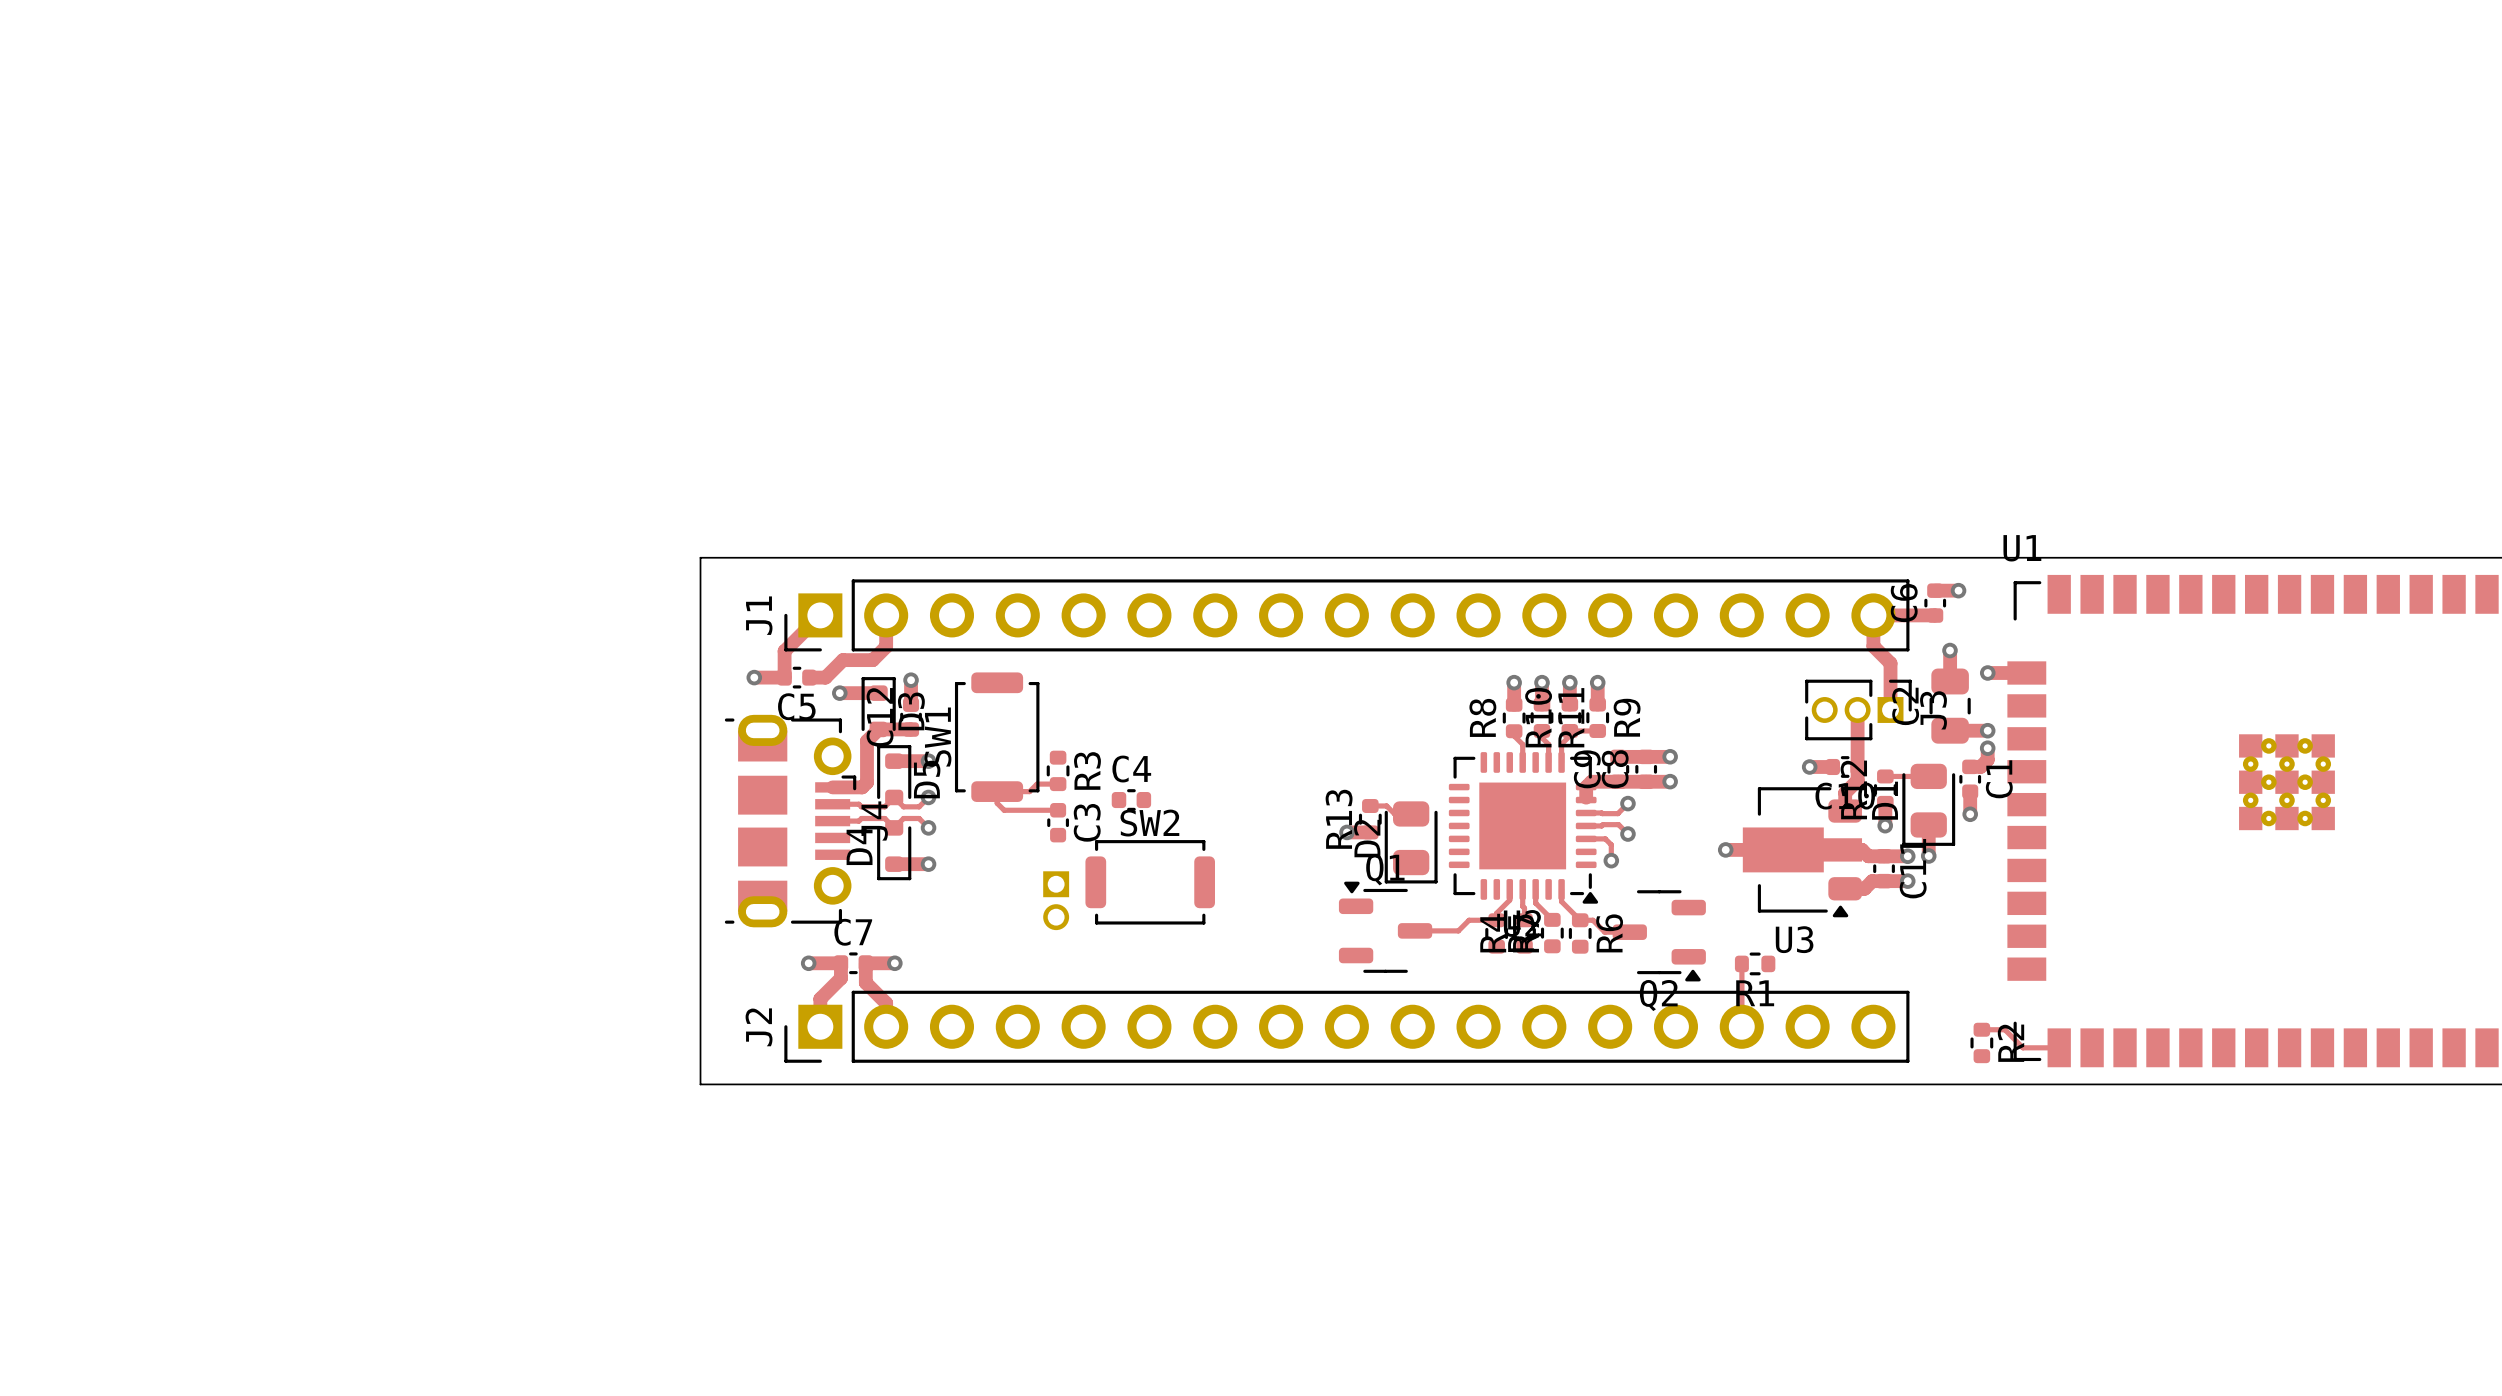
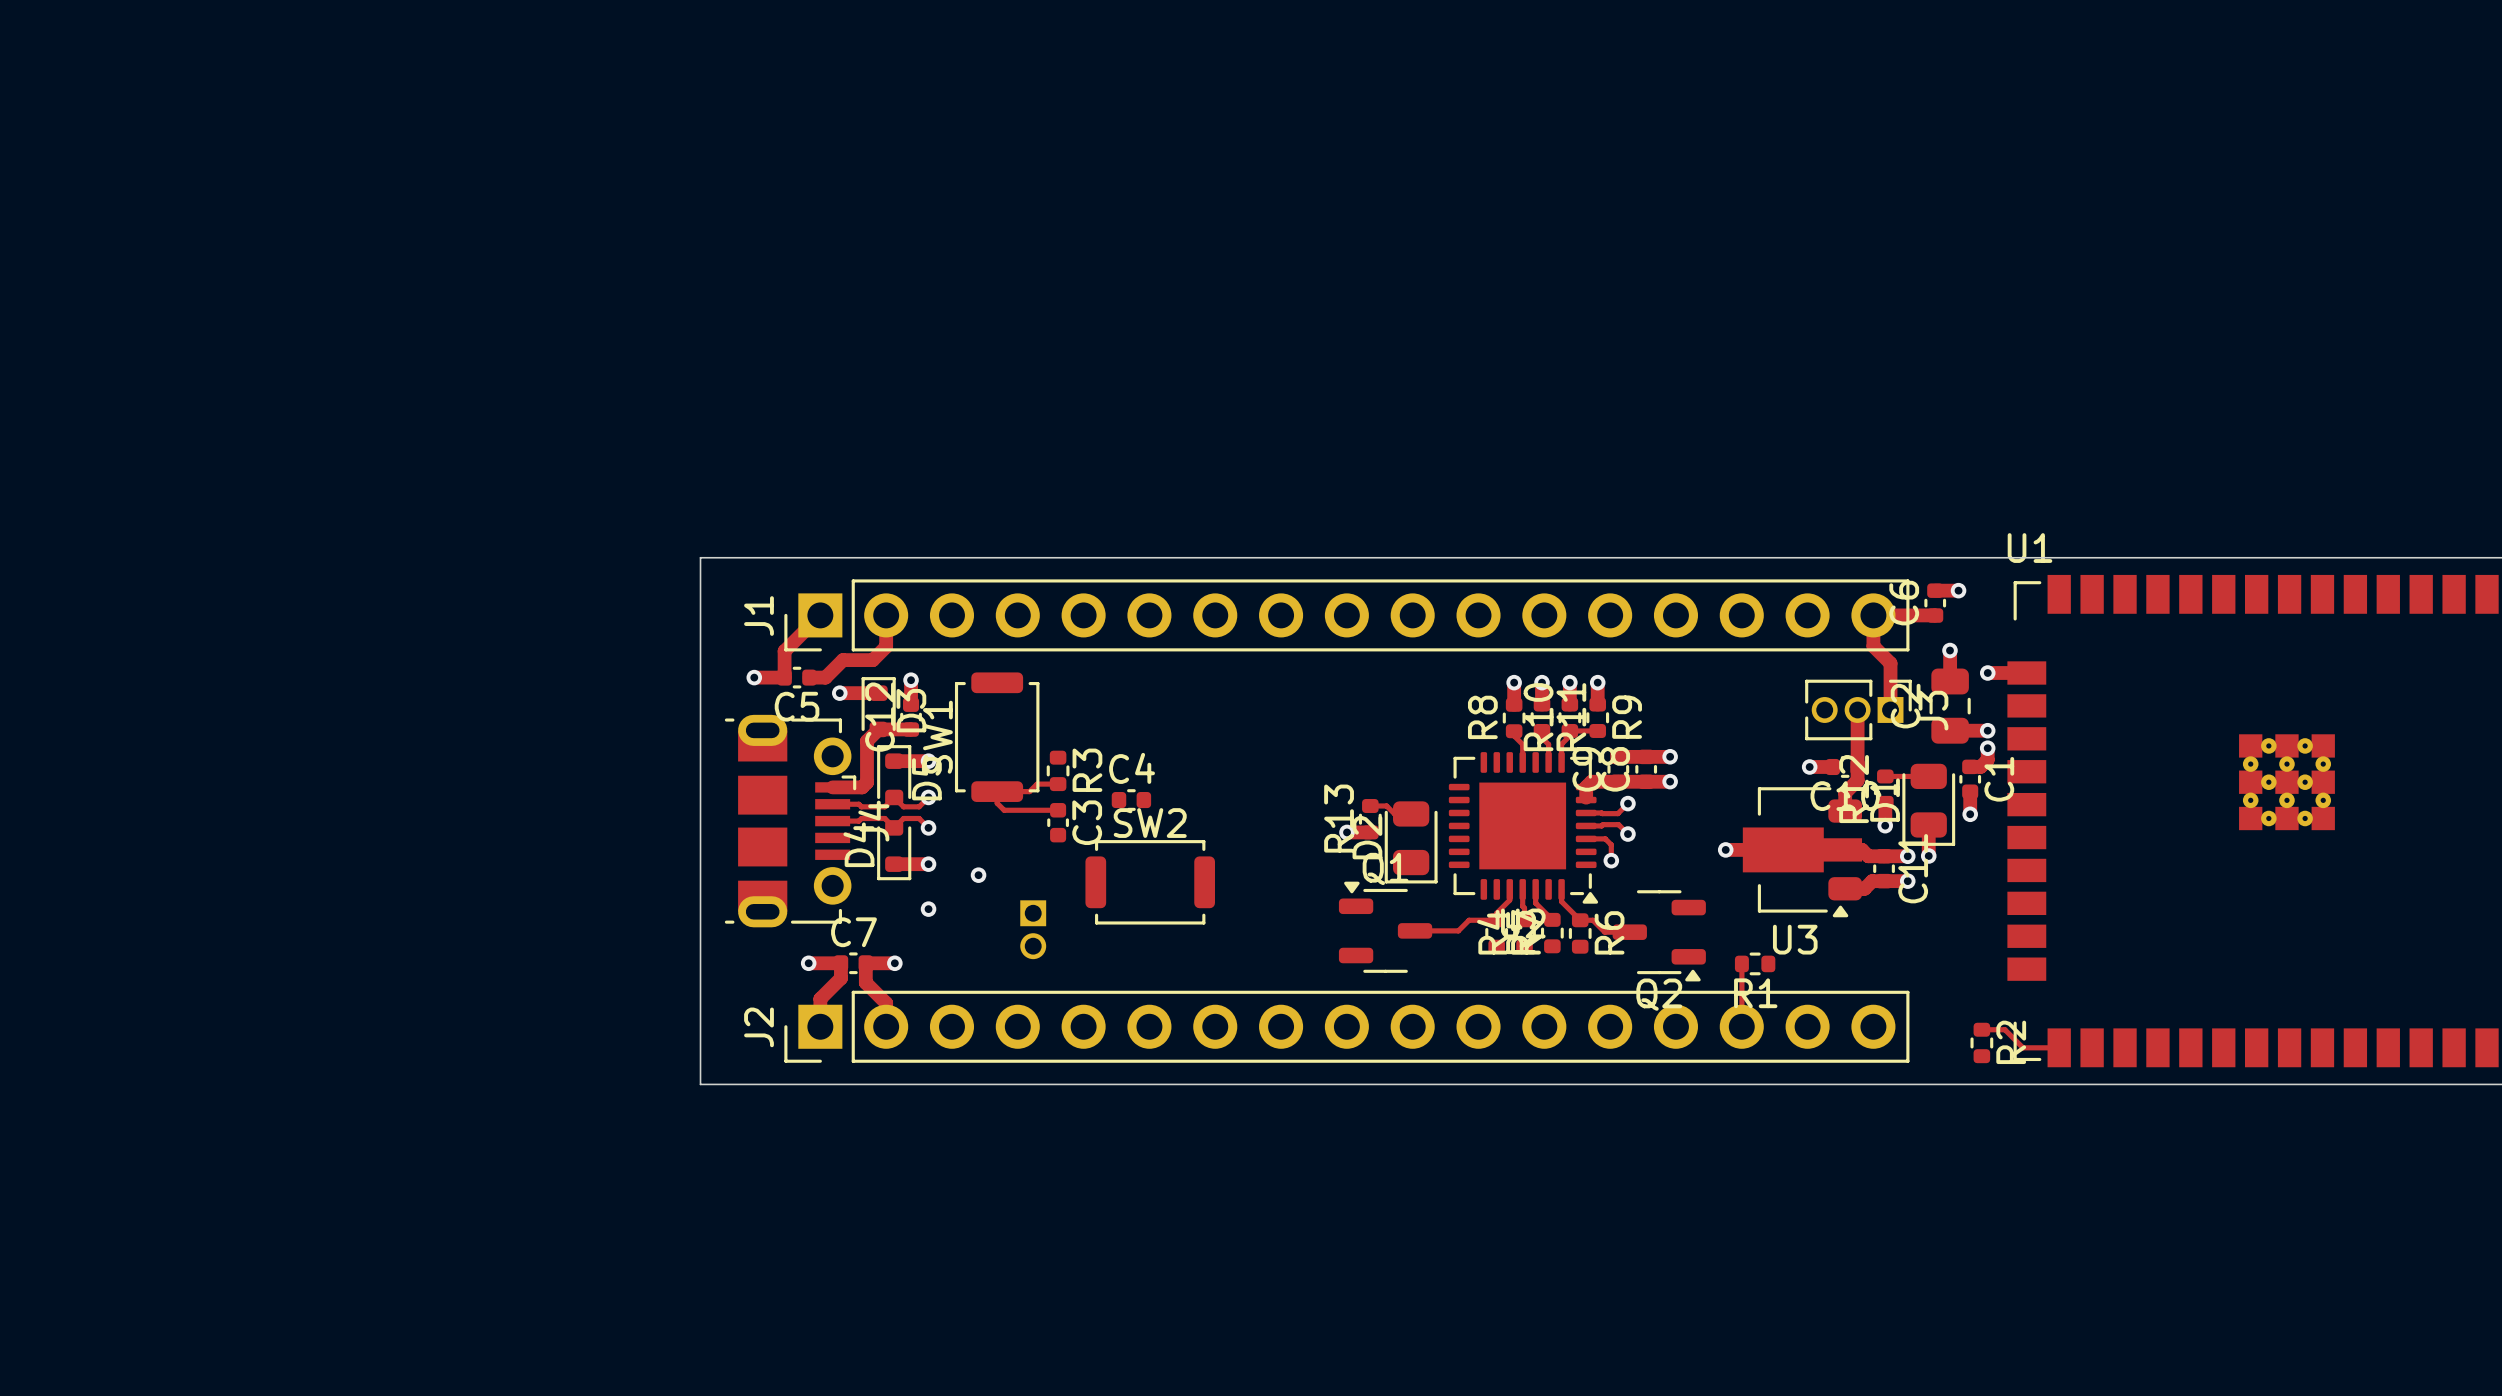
via: none -> (978, 875)
part position: (1056, 900) -> (1033, 929)
via: none -> (928, 909)

